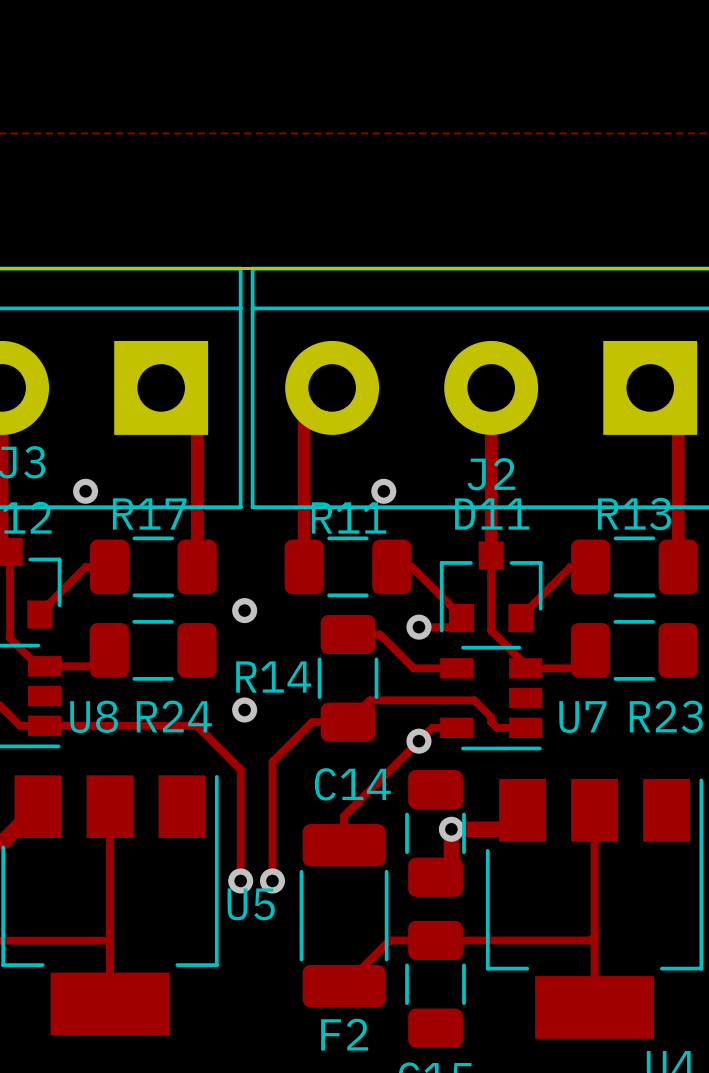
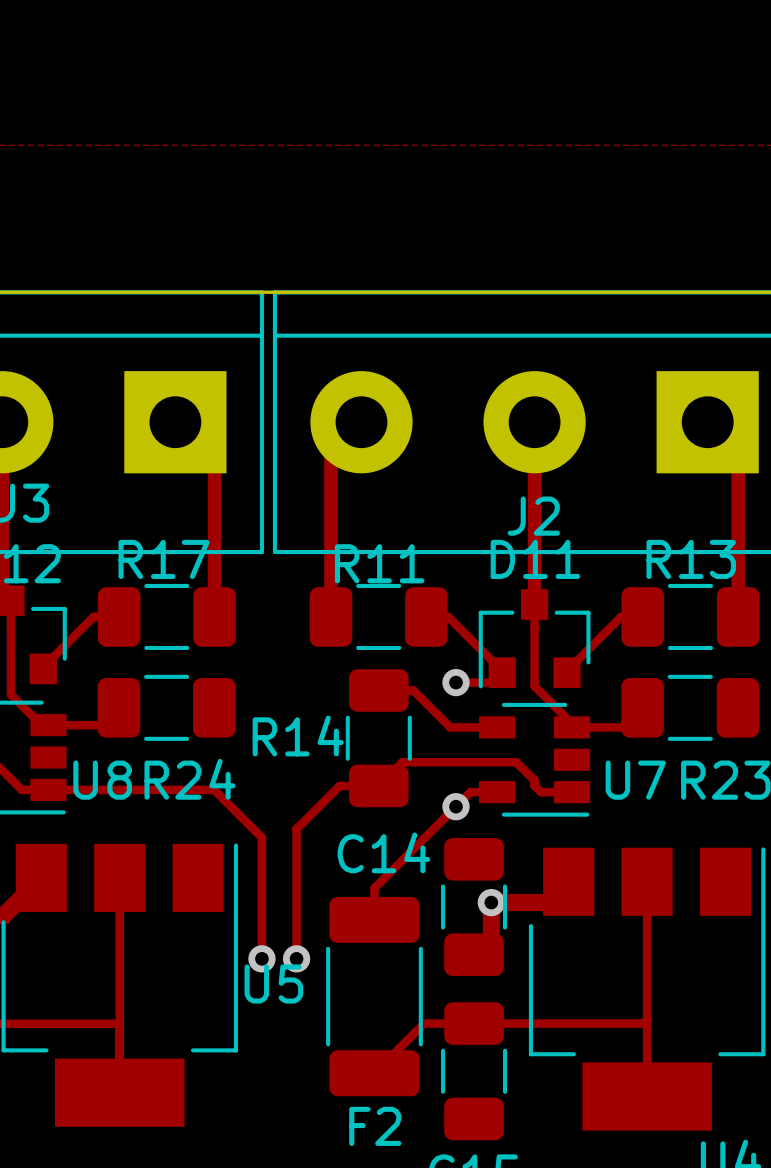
via: (85, 491) -> none
via: (383, 491) -> none
via: (244, 610) -> none
via: (244, 709) -> none

